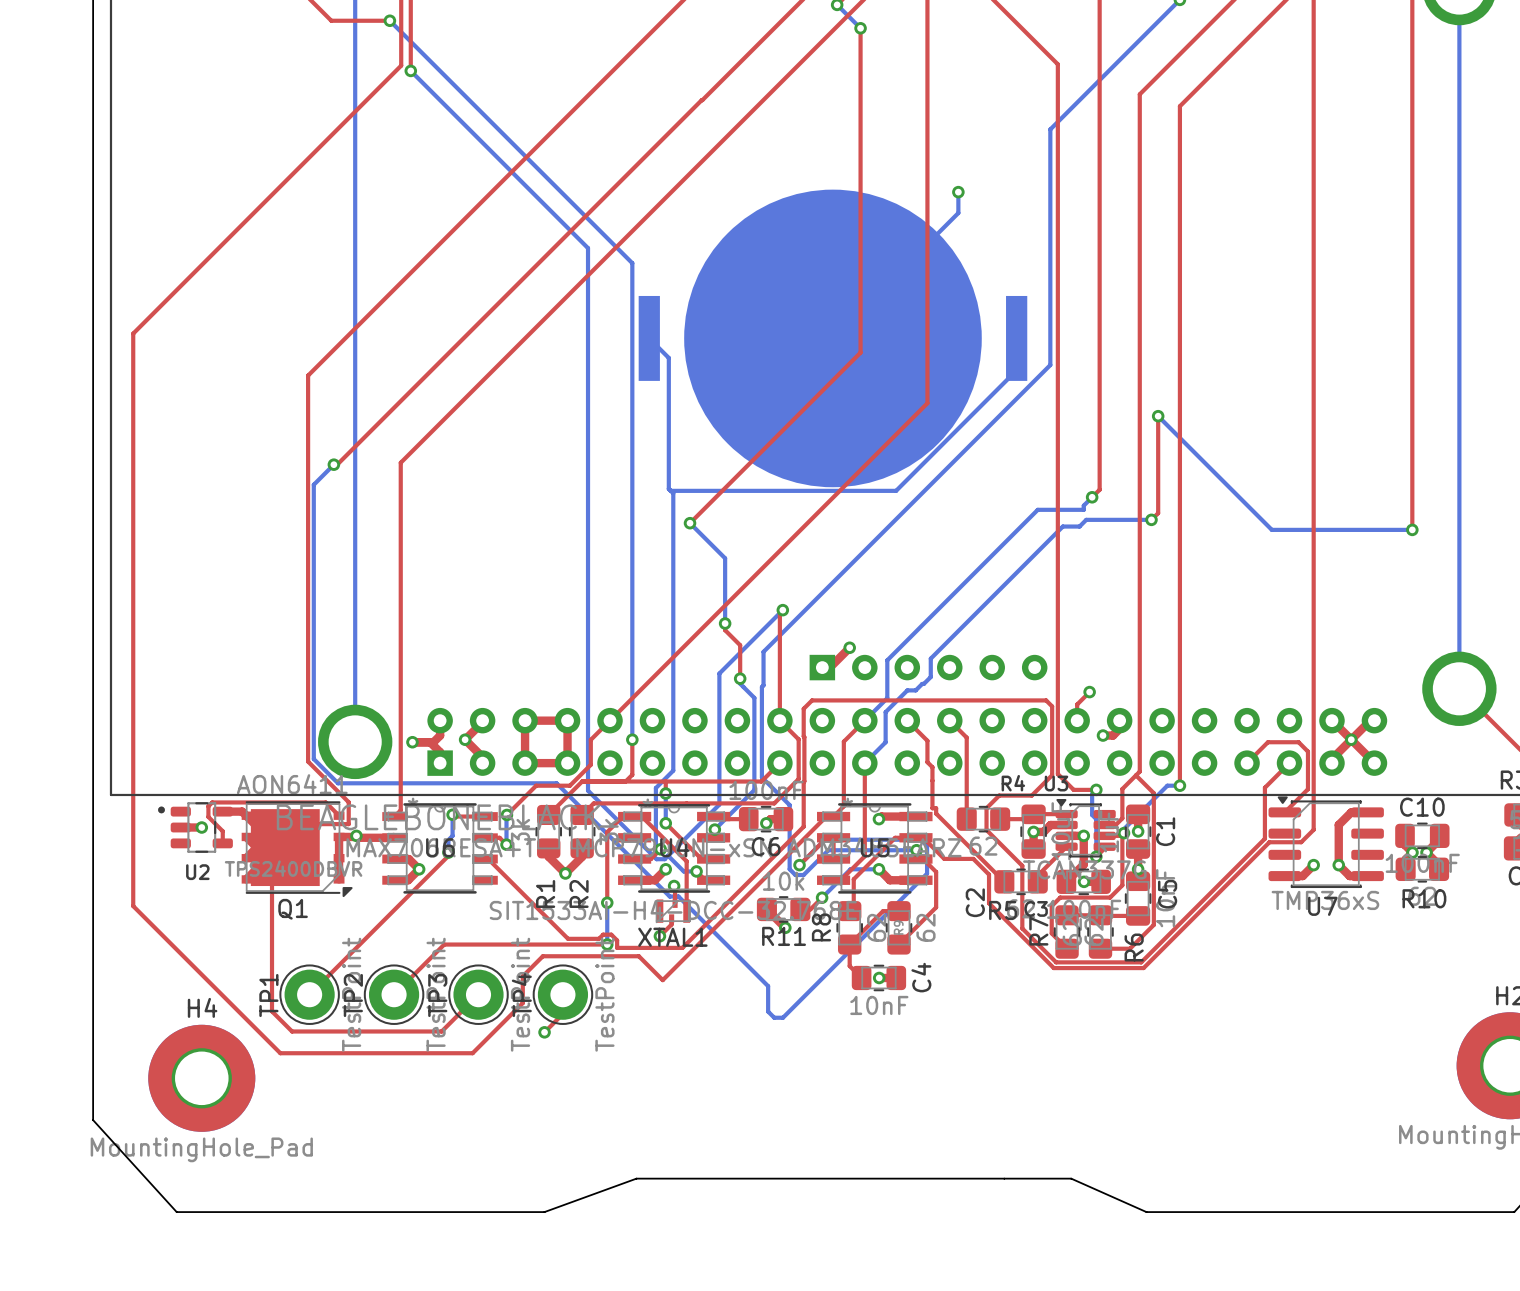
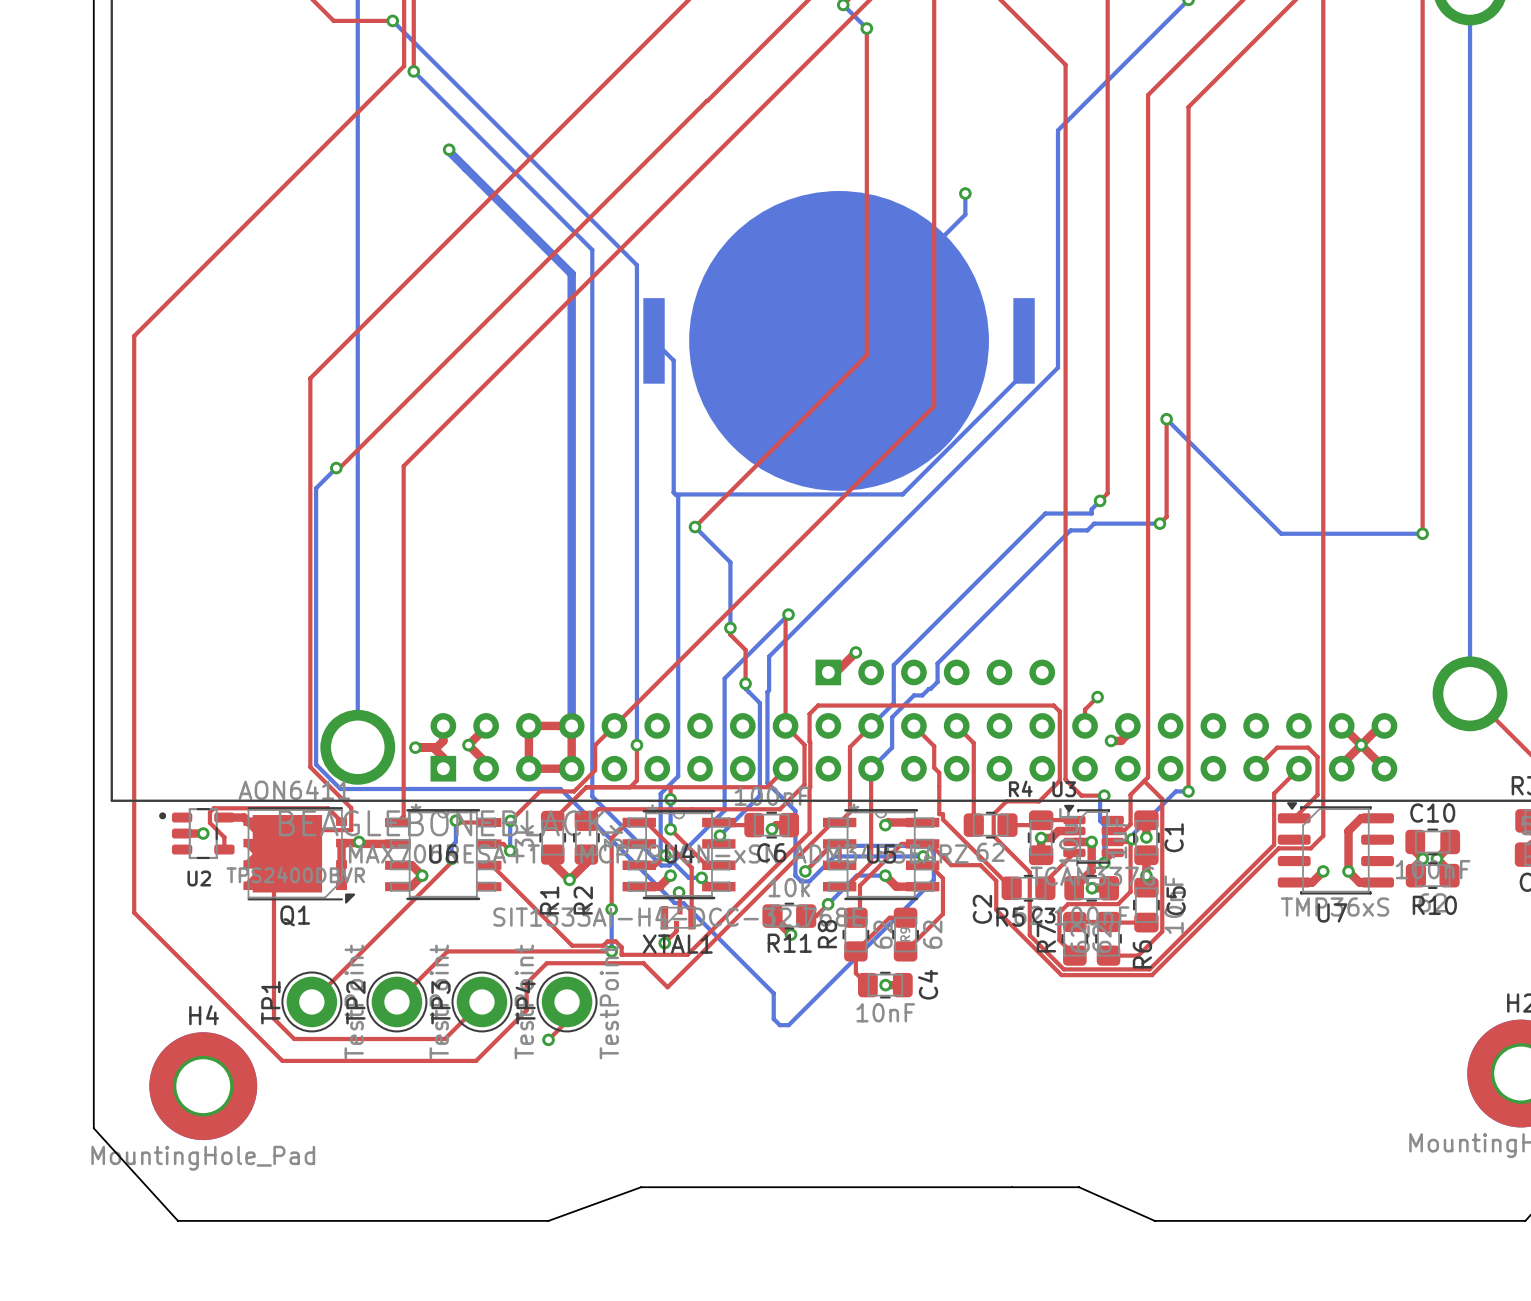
bottom track: none -> (449, 149) (571, 273) (571, 725)
via: none -> (449, 149)

